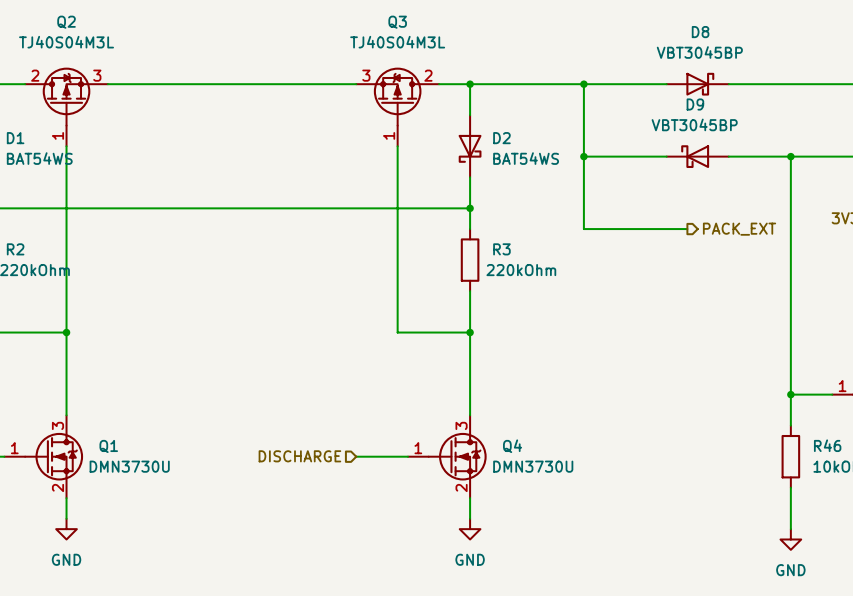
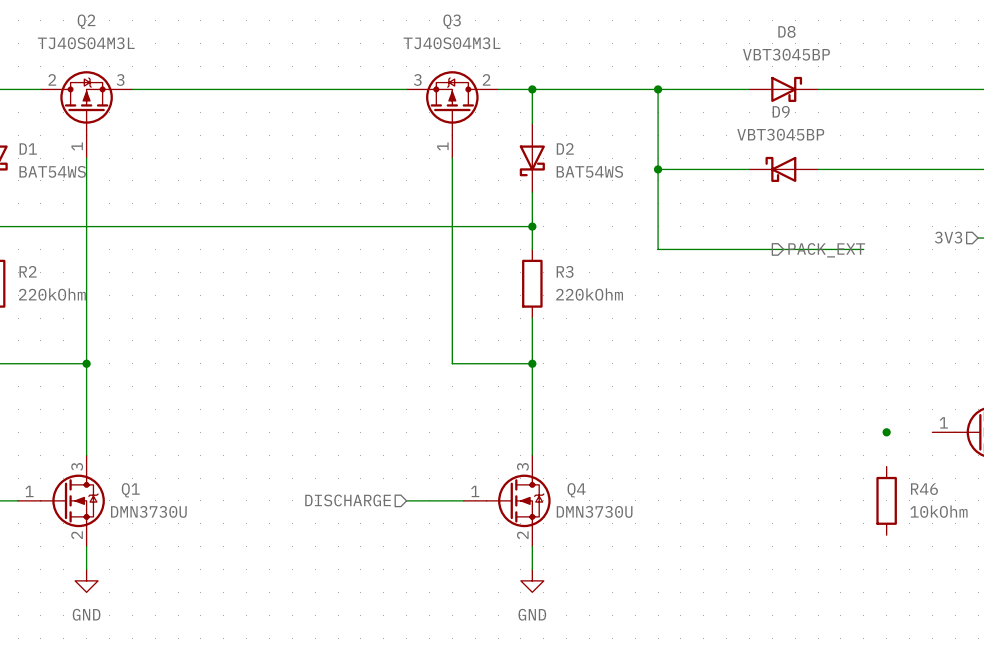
wire: (790, 156) (790, 425) -> none
junction: (790, 156) -> none
wire: none -> (772, 249) (863, 249)
wire: (790, 394) (832, 394) -> none
wire: (790, 487) (790, 529) -> none
power symbol: GND (790, 539) -> none

